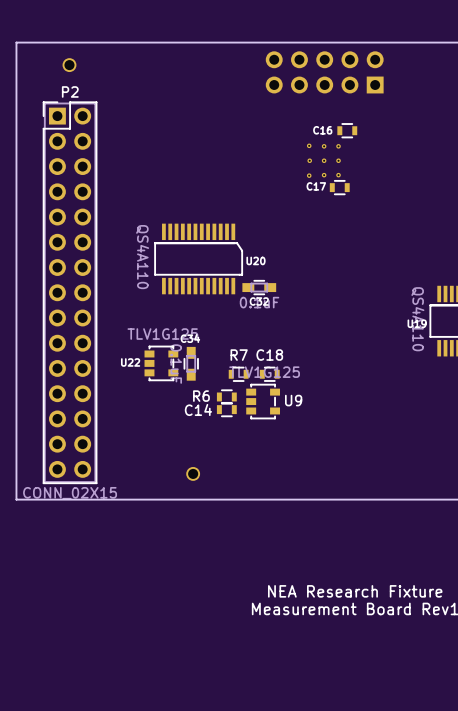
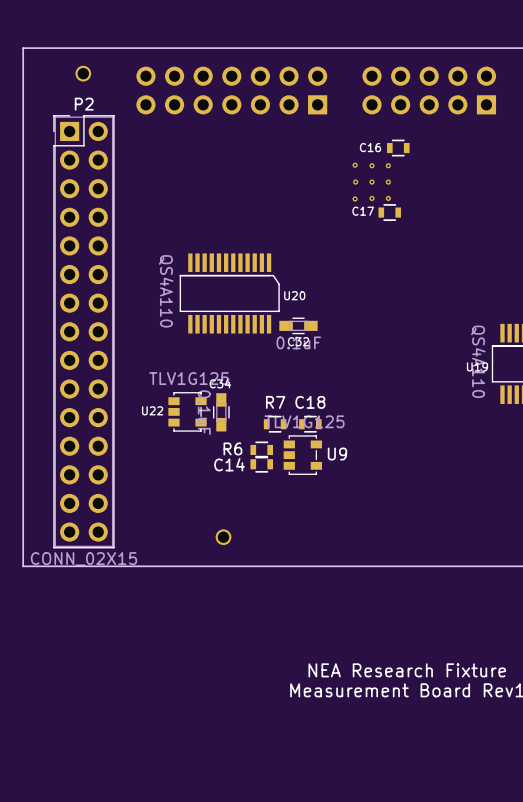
part position: (324, 72) -> (429, 90)
part: none -> (231, 90)

